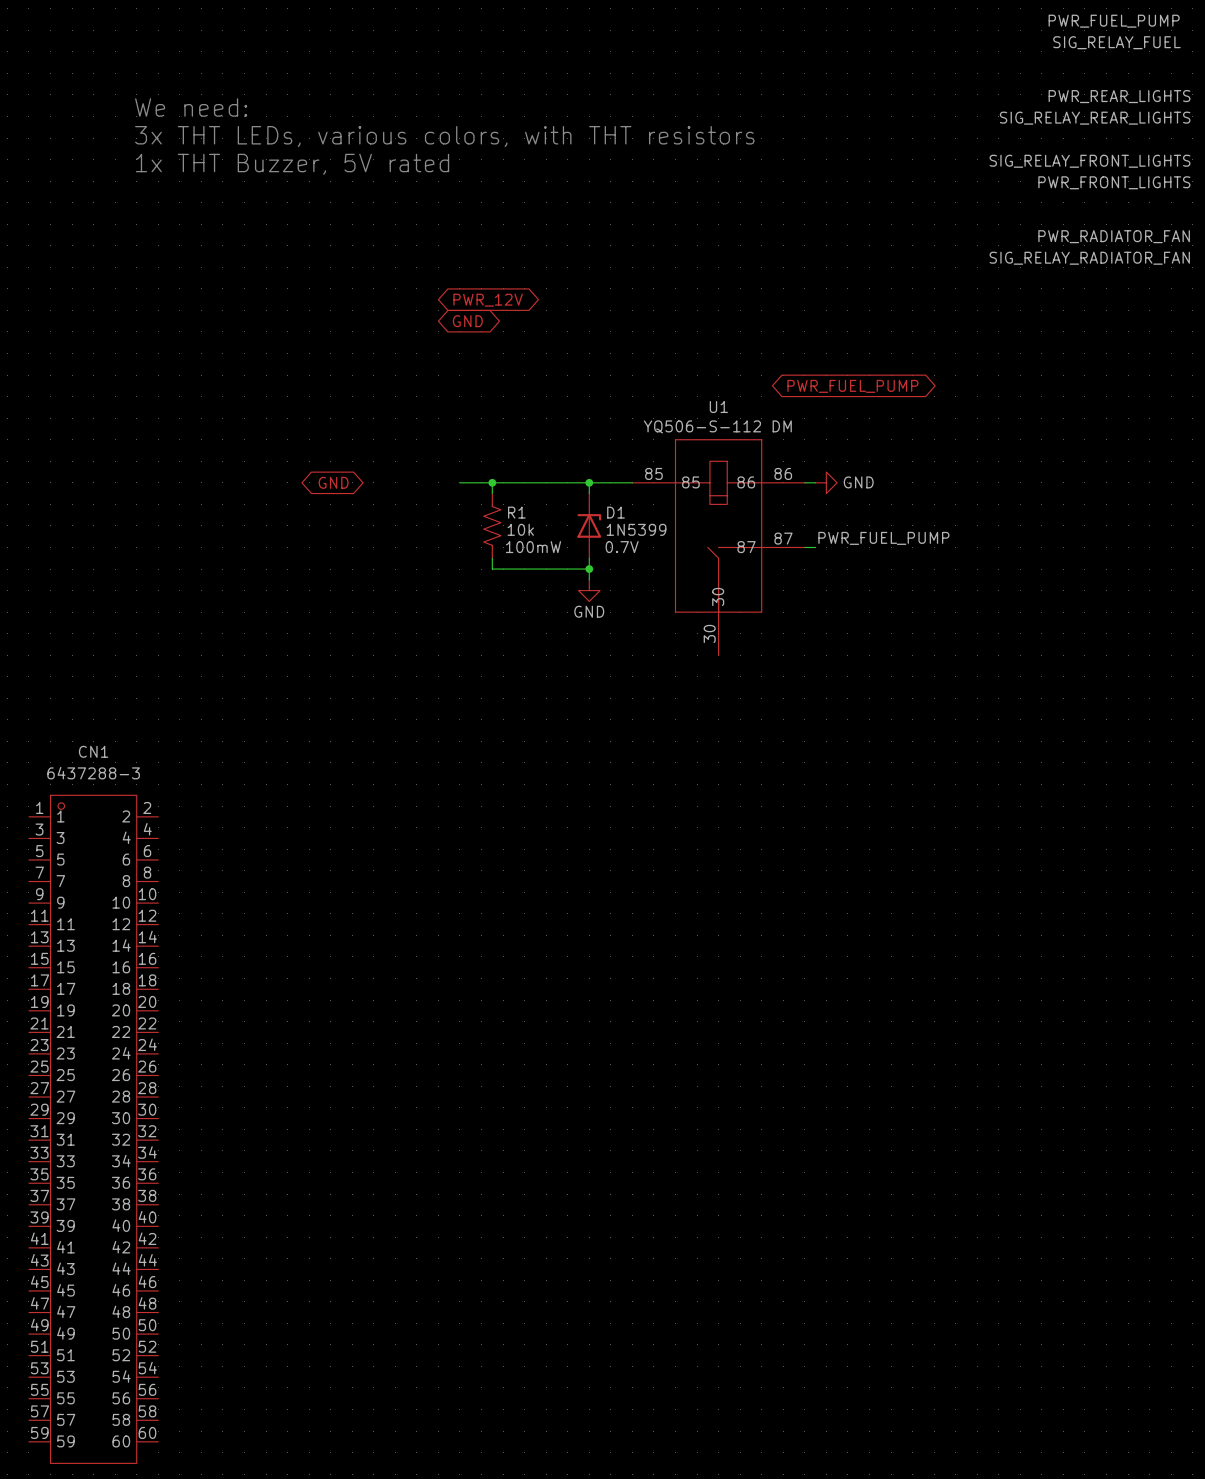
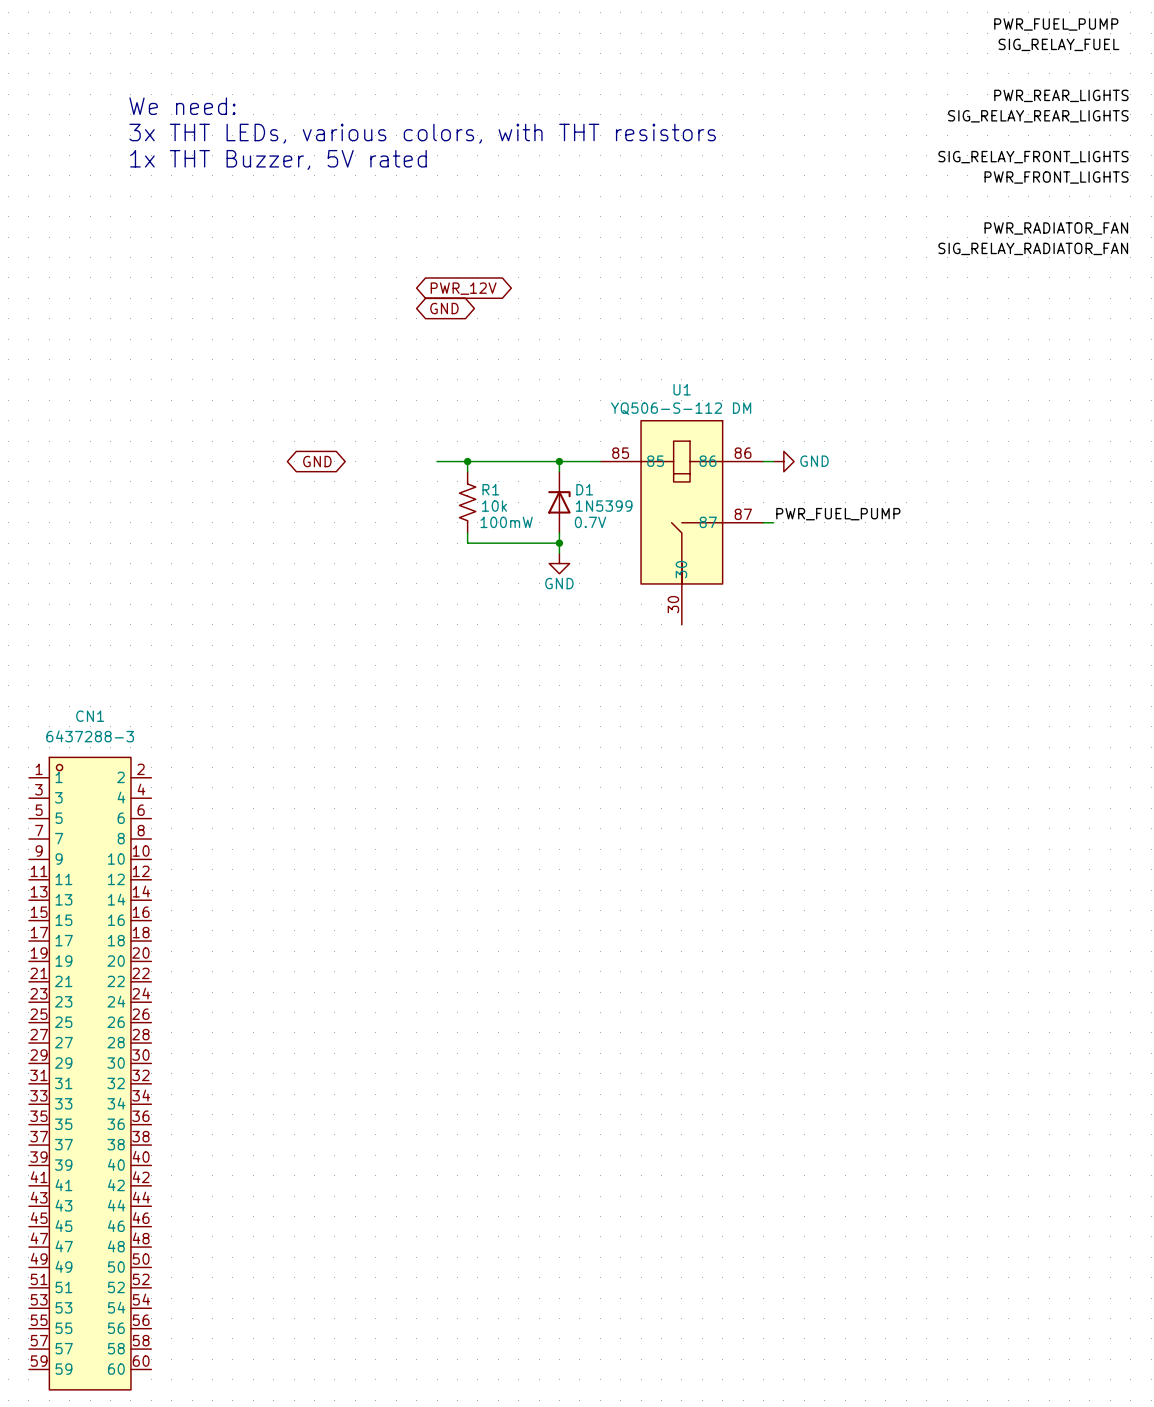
global label: PWR_FUEL_PUMP (852, 386) -> none

